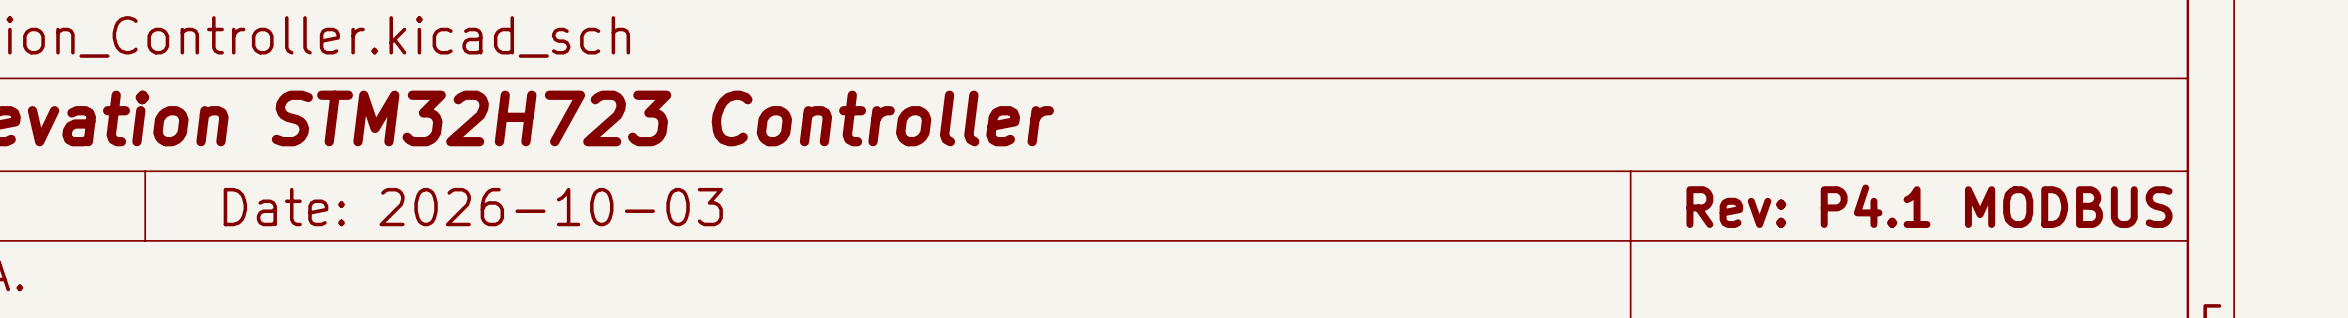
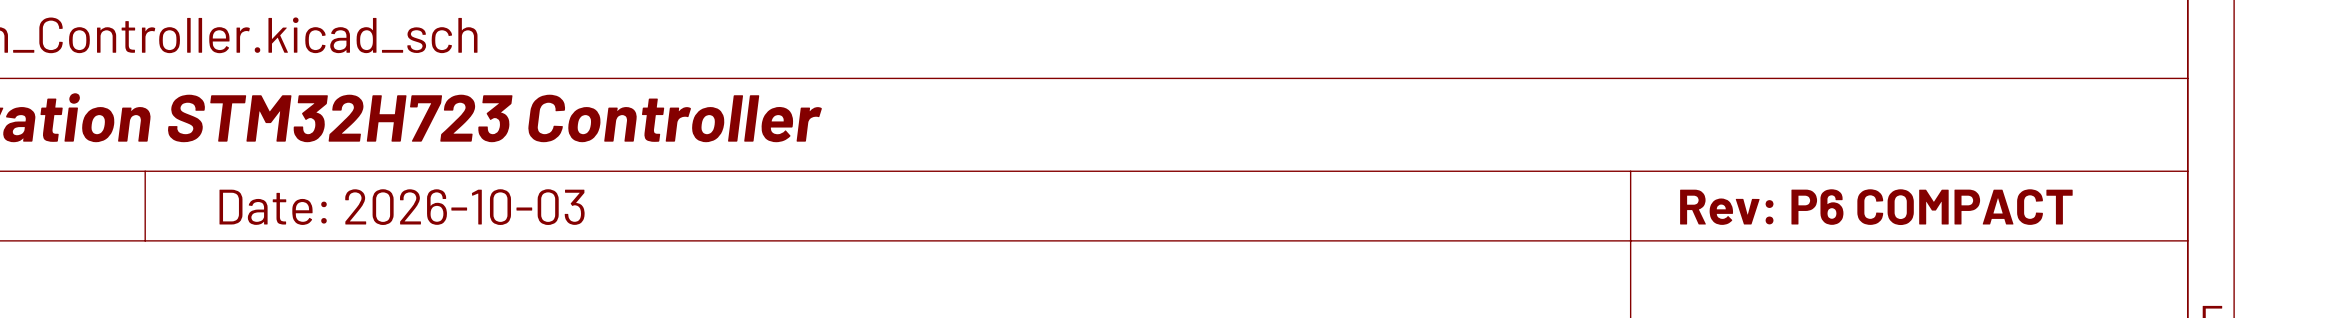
title block: Rev: P4.1 MODBUS (1929, 206) -> Rev: P6 COMPACT (1876, 207)

